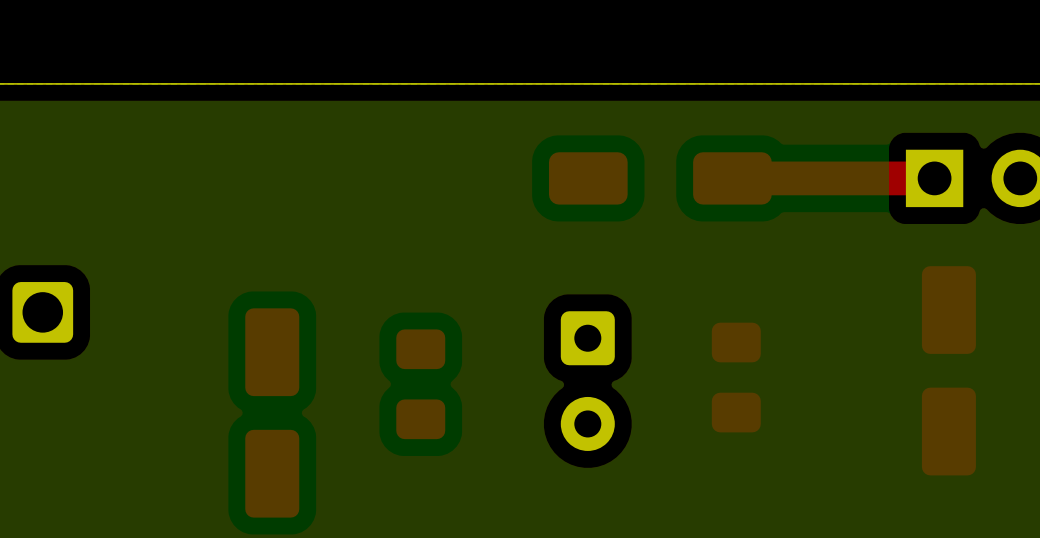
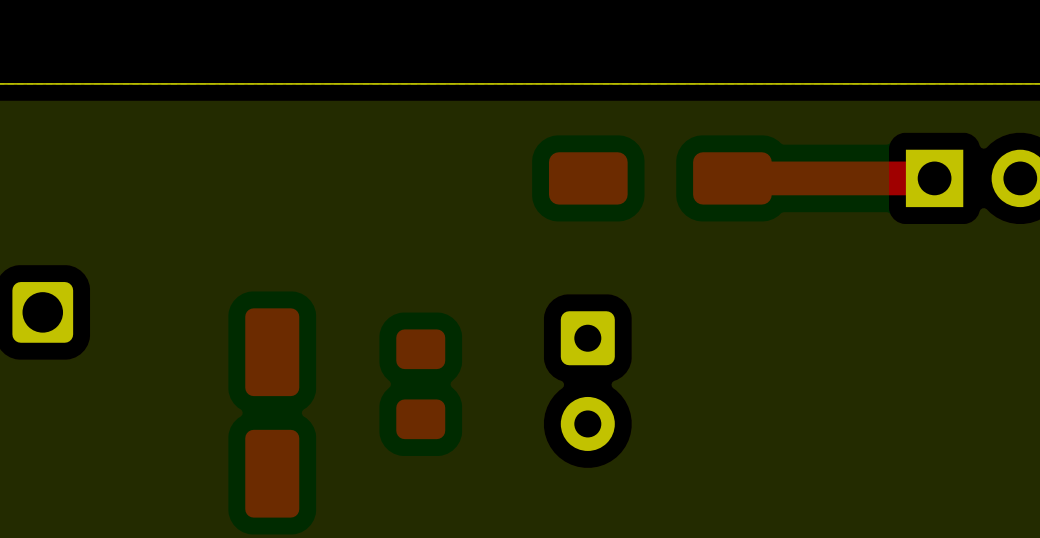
part: (948, 370) -> none
part: (736, 377) -> none

